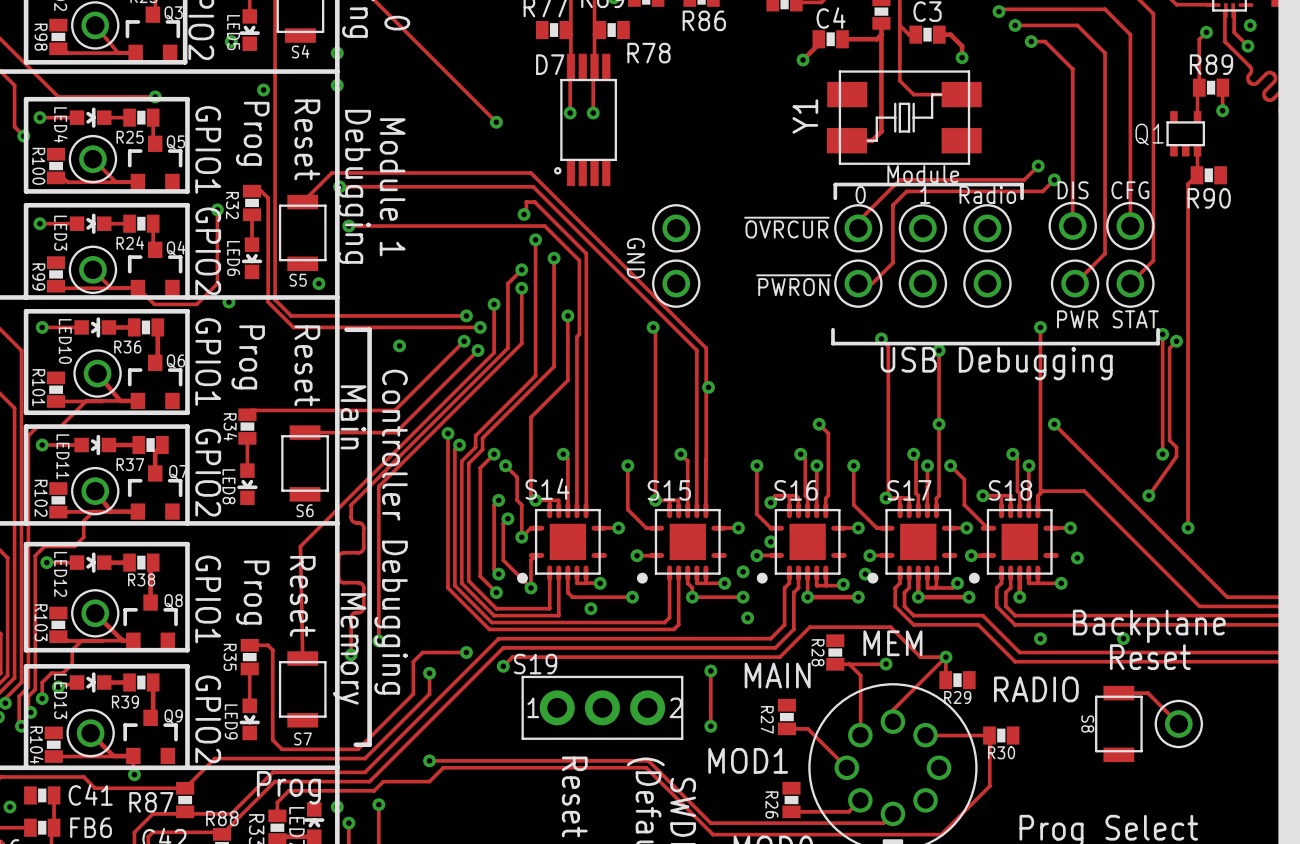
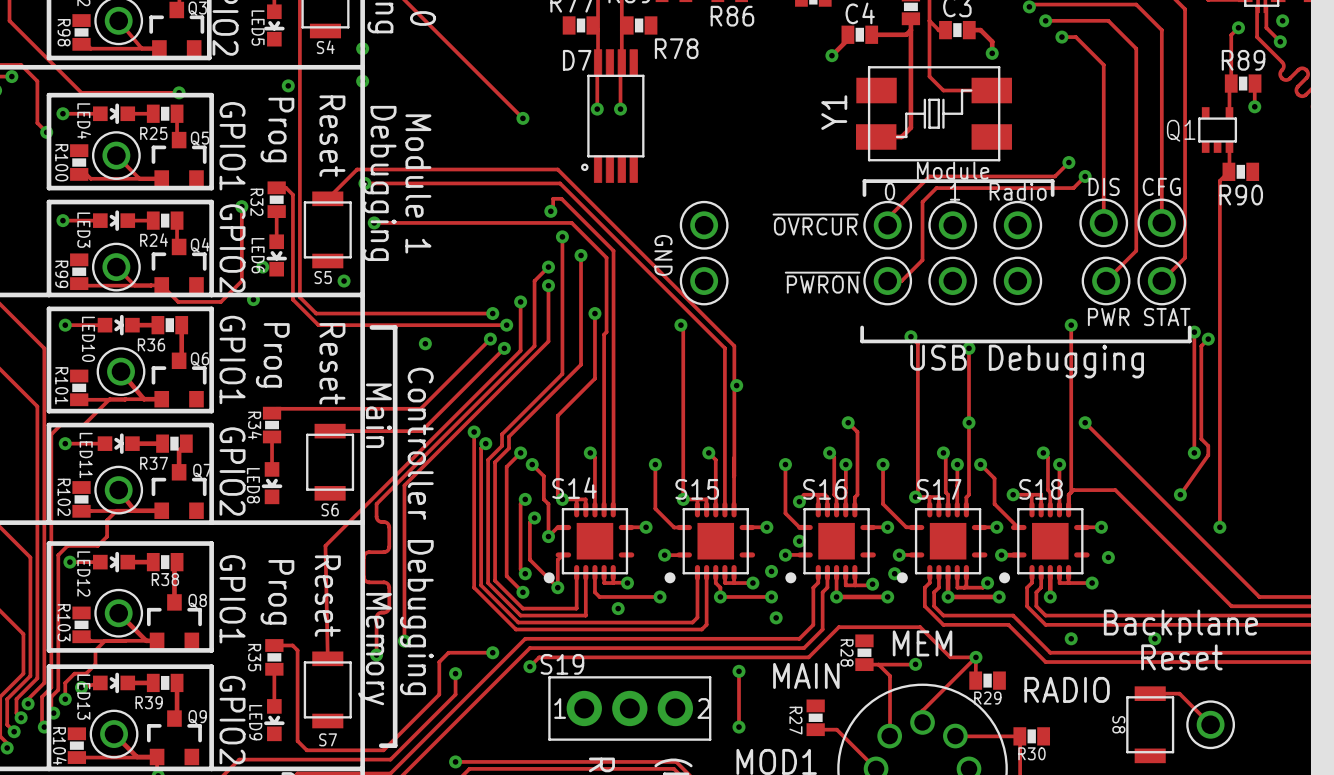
via: (231, 41) -> none
via: none -> (262, 267)

